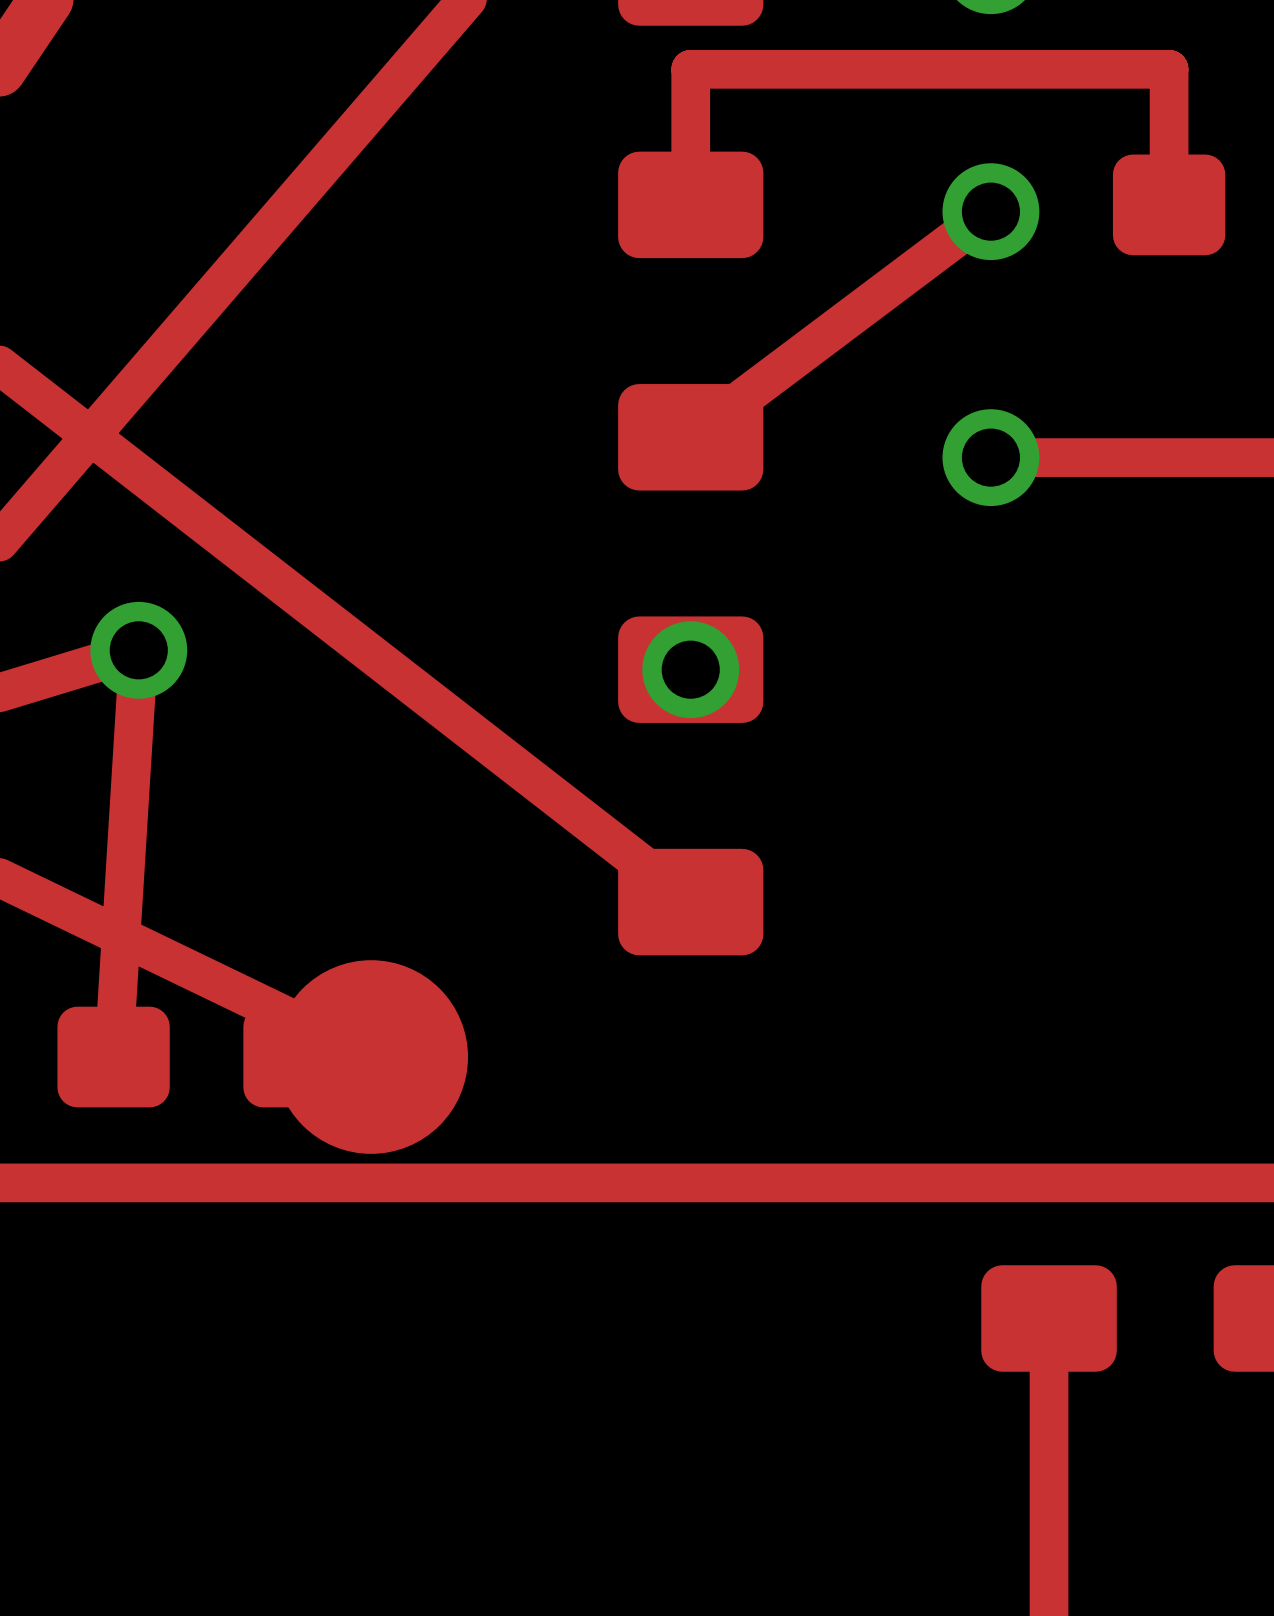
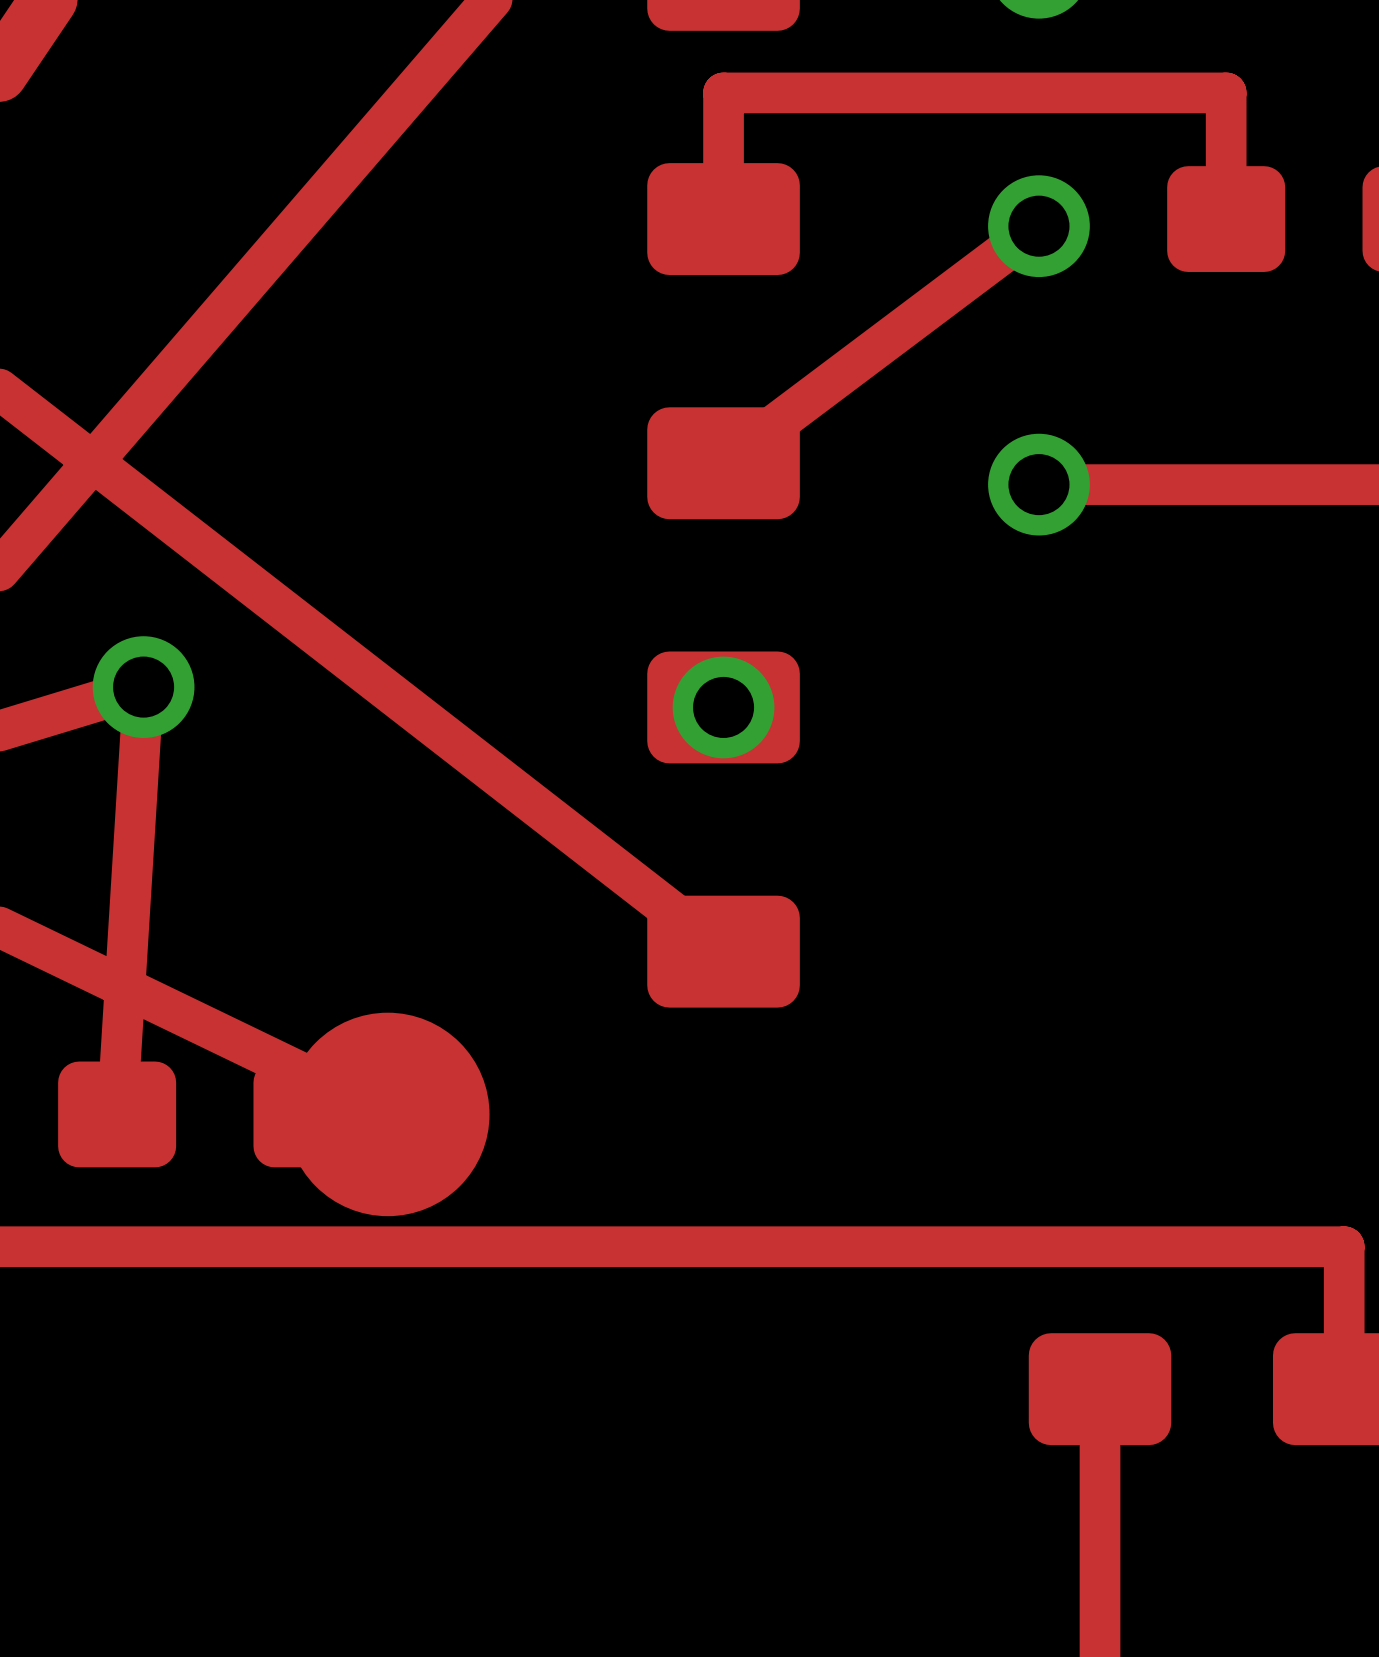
track: (690, 84) (690, 69) (1169, 69) (1169, 84) -> (723, 92) (1226, 92)

